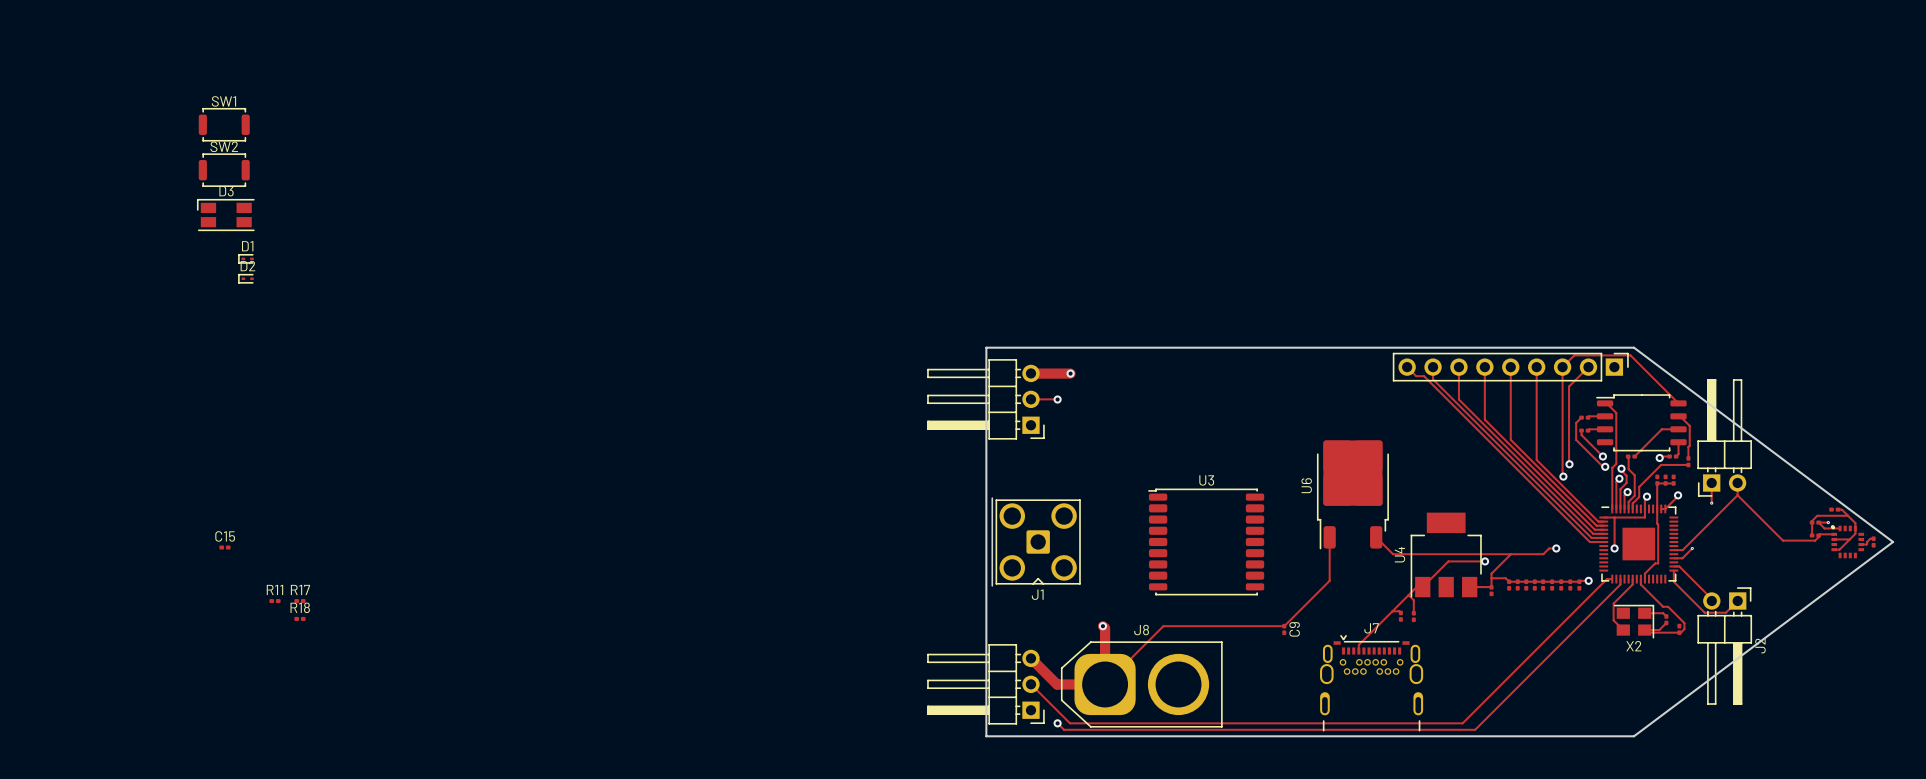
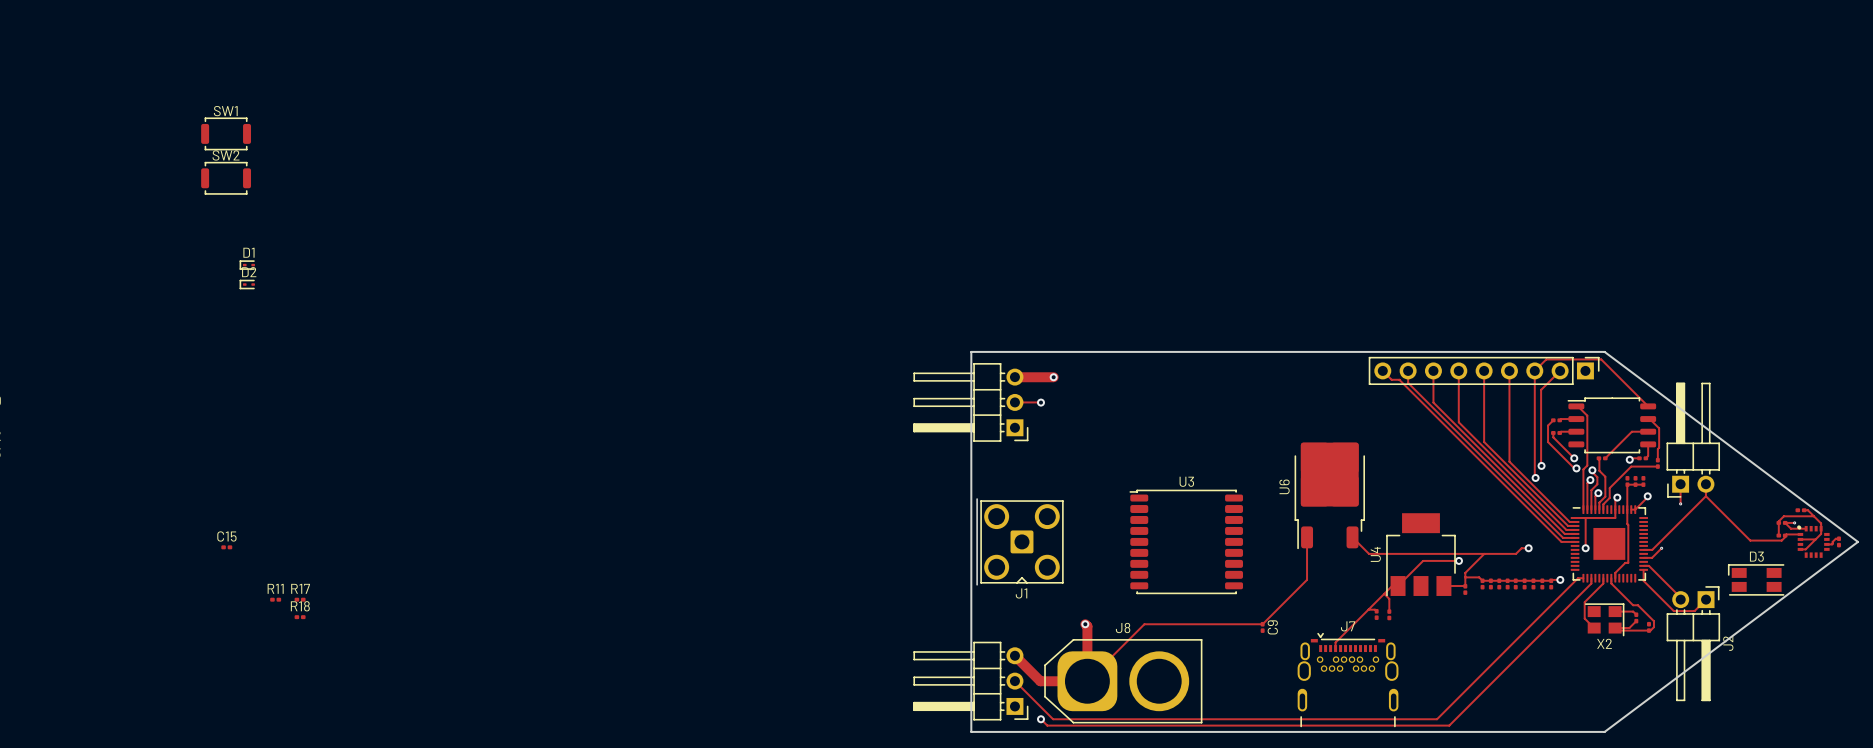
D3 position: (225, 215) -> (1756, 579)

